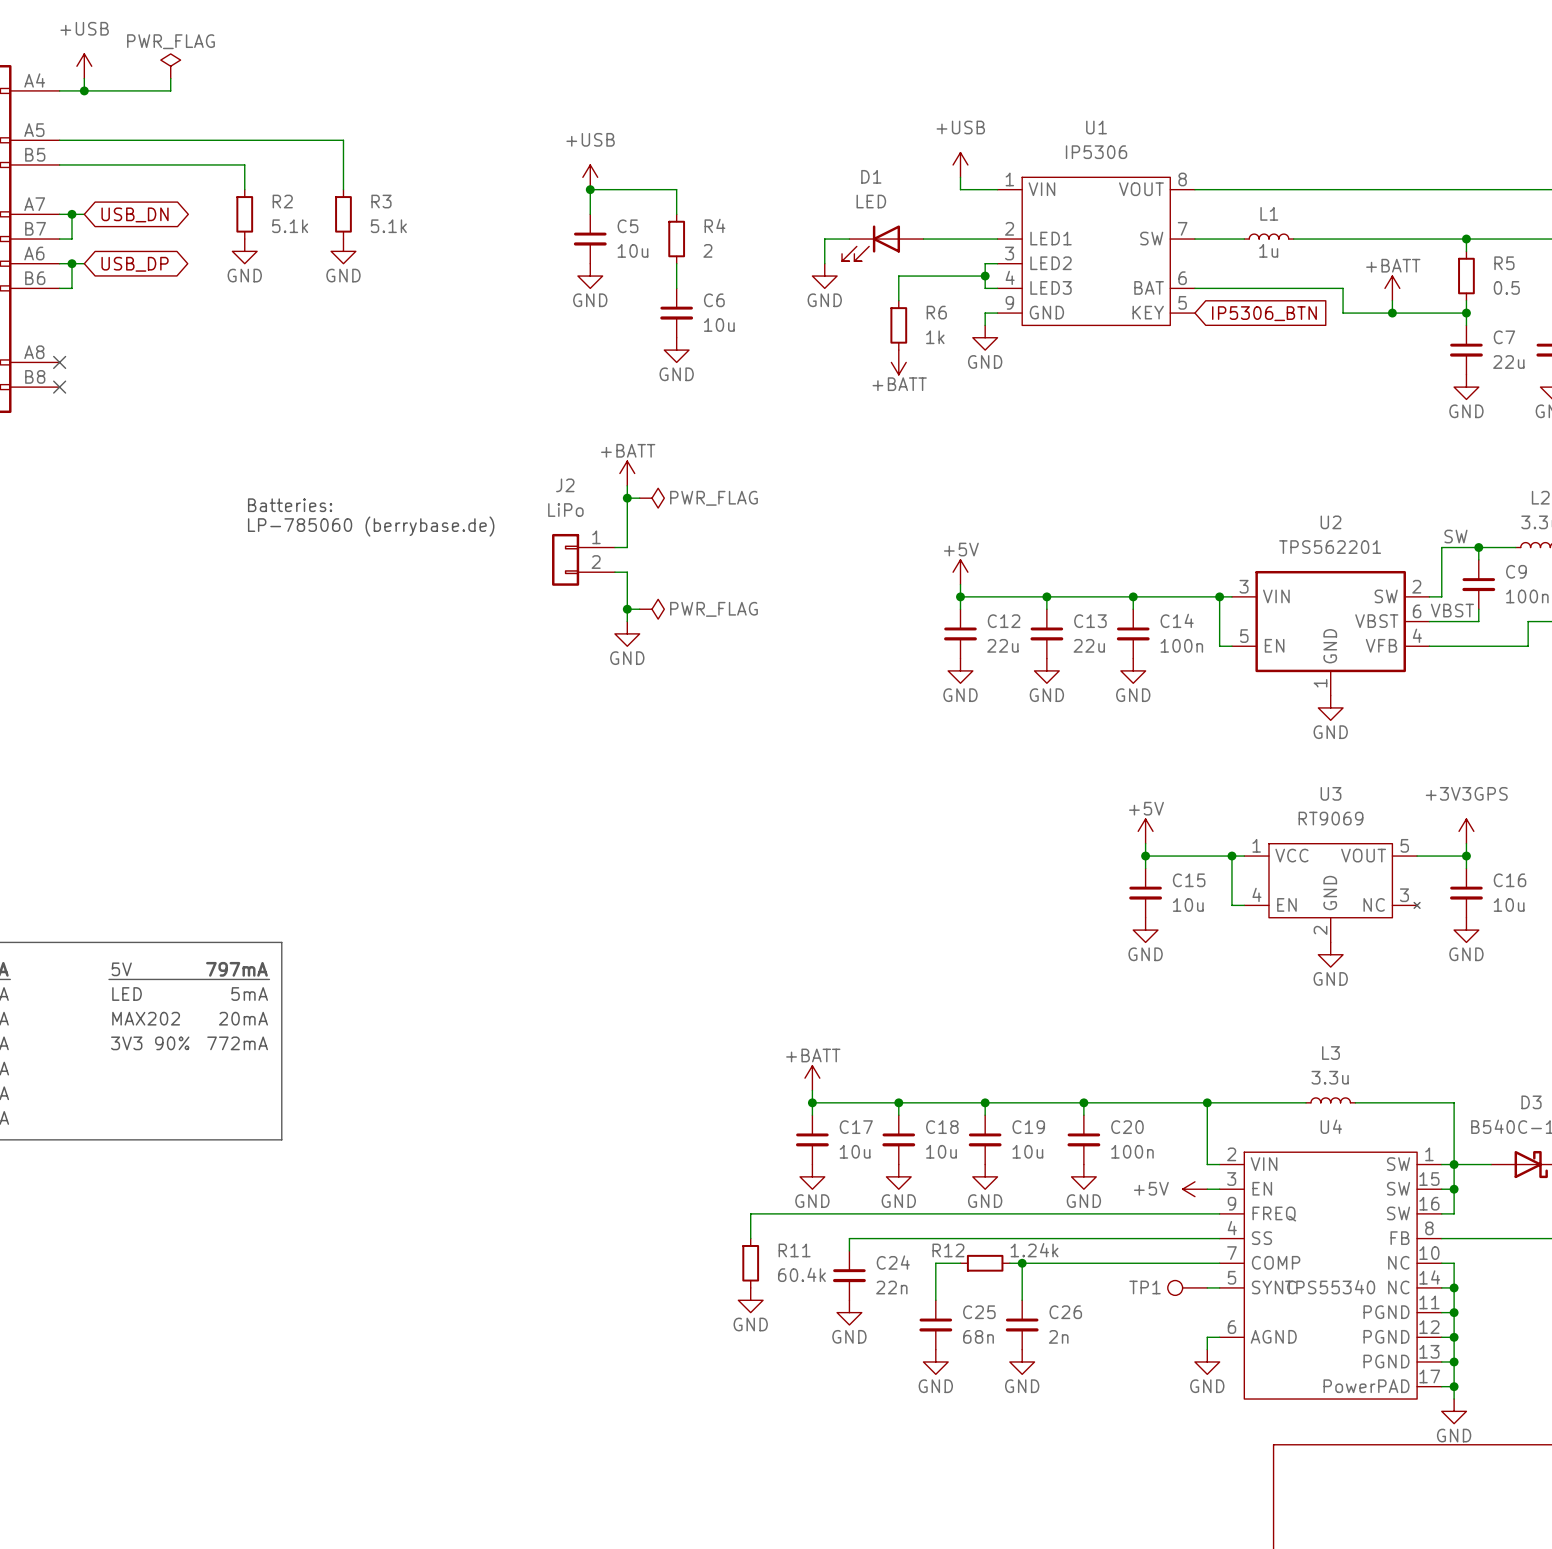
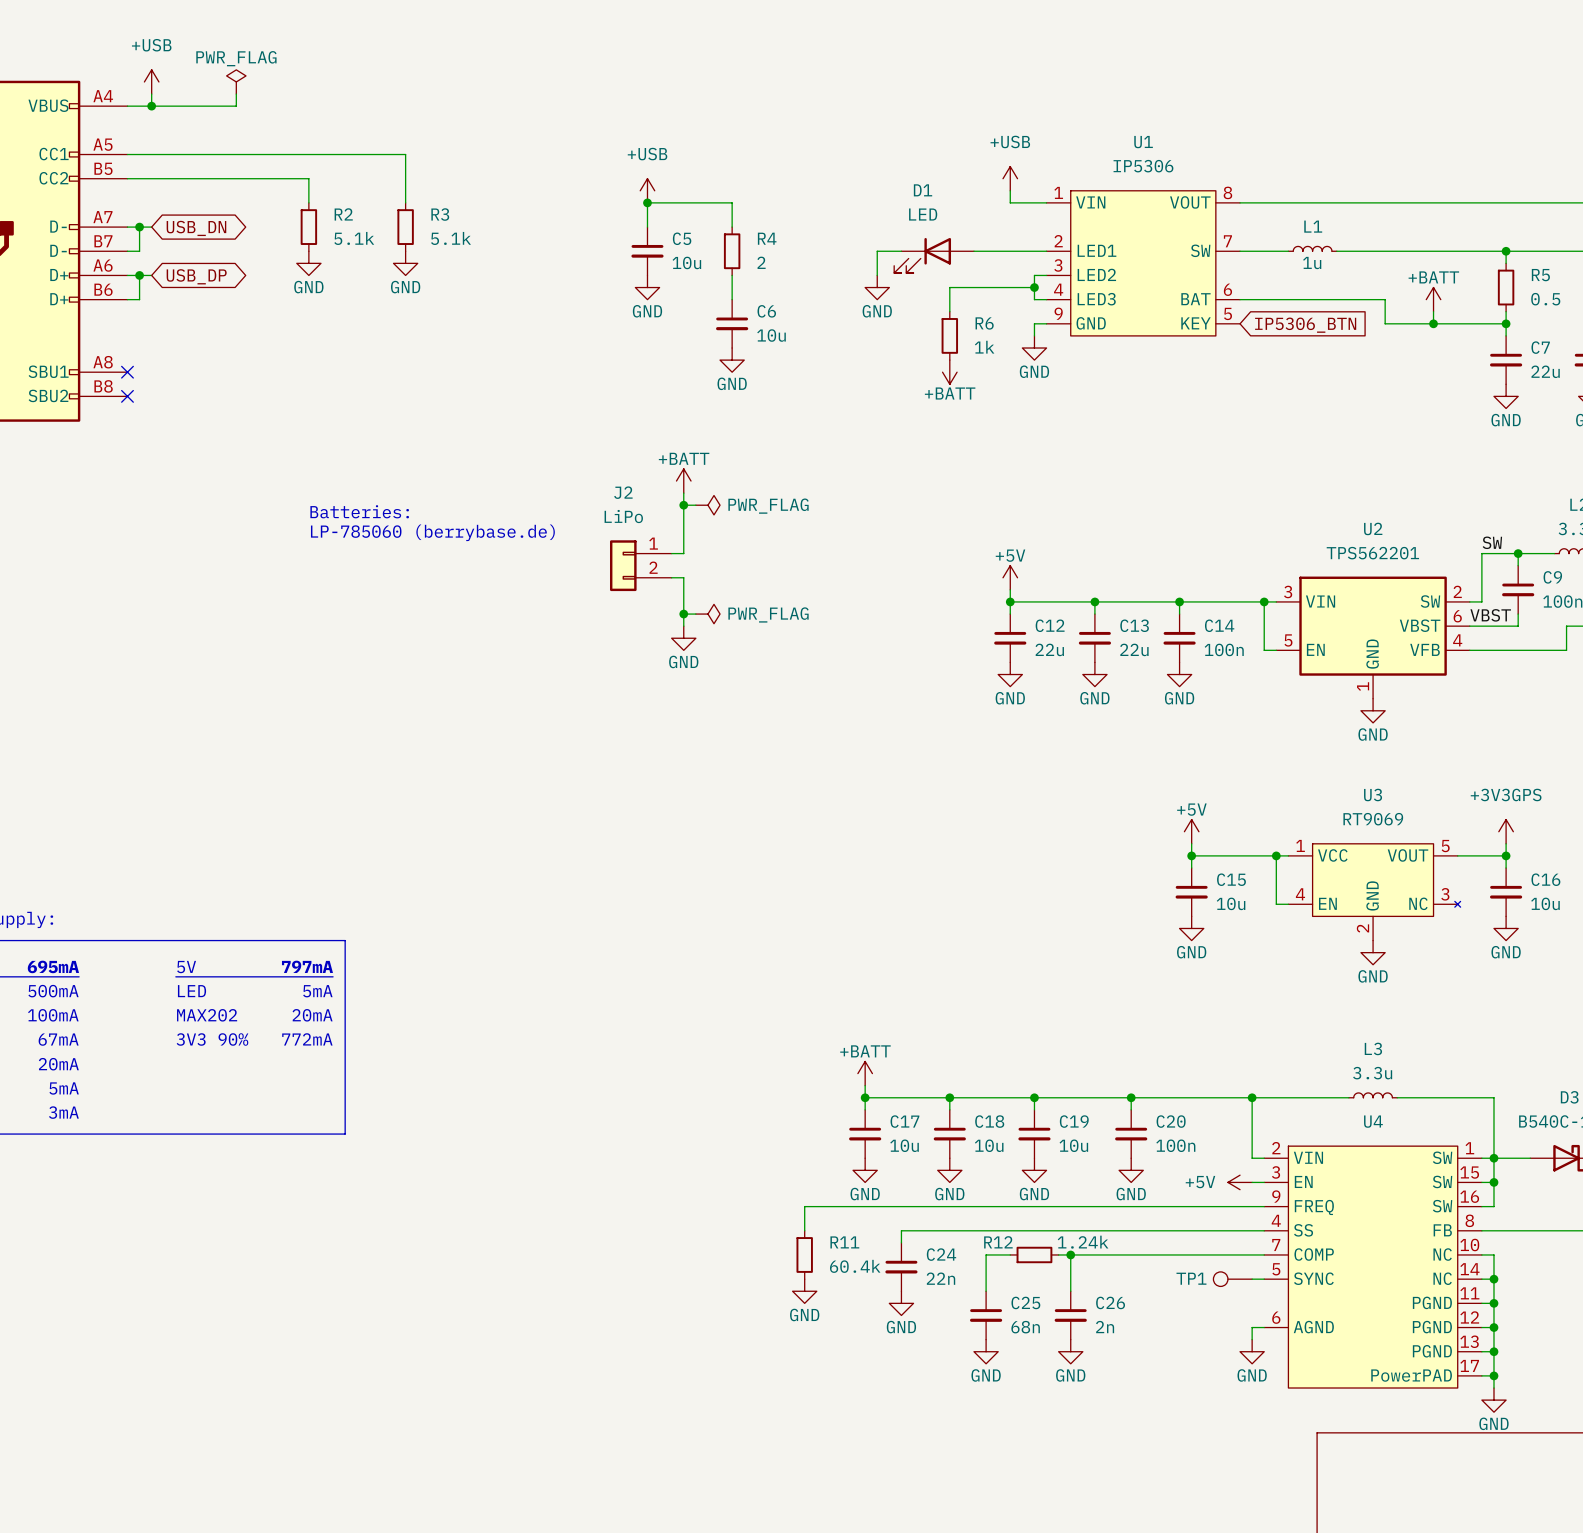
U4 value: TPS55340 (1330, 1287) -> none

